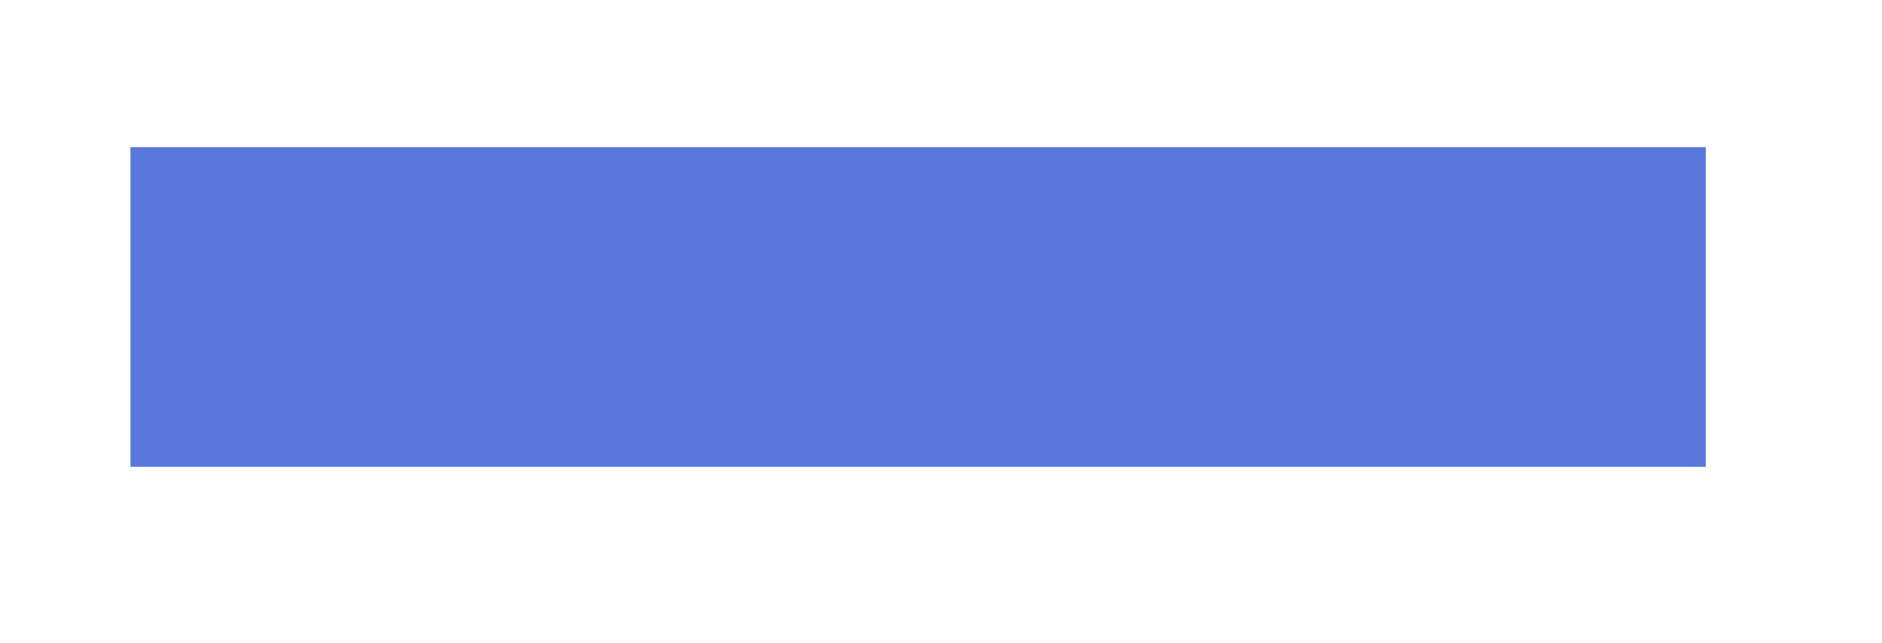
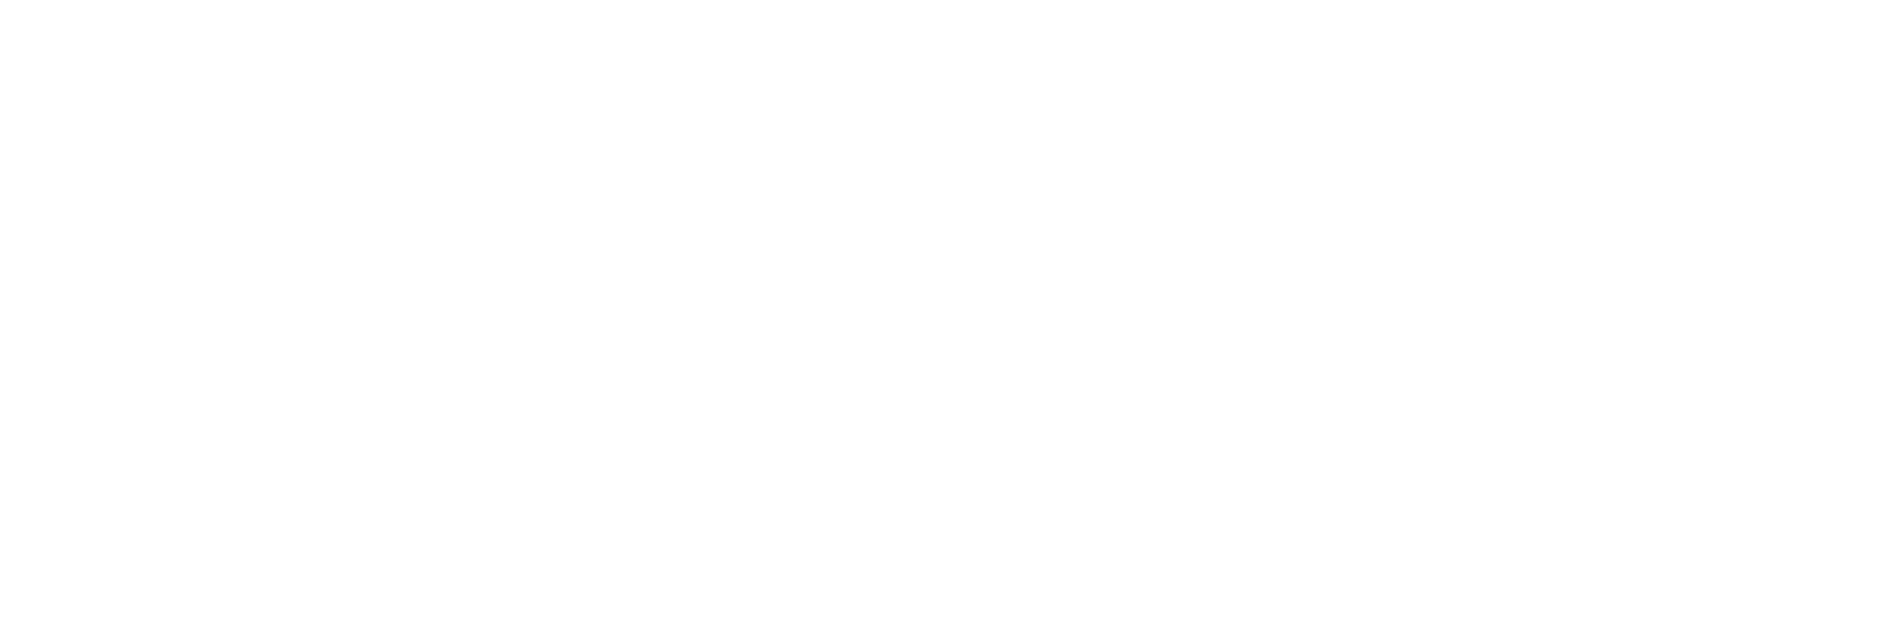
drawing: [130, 147, 1706, 467] -> none

